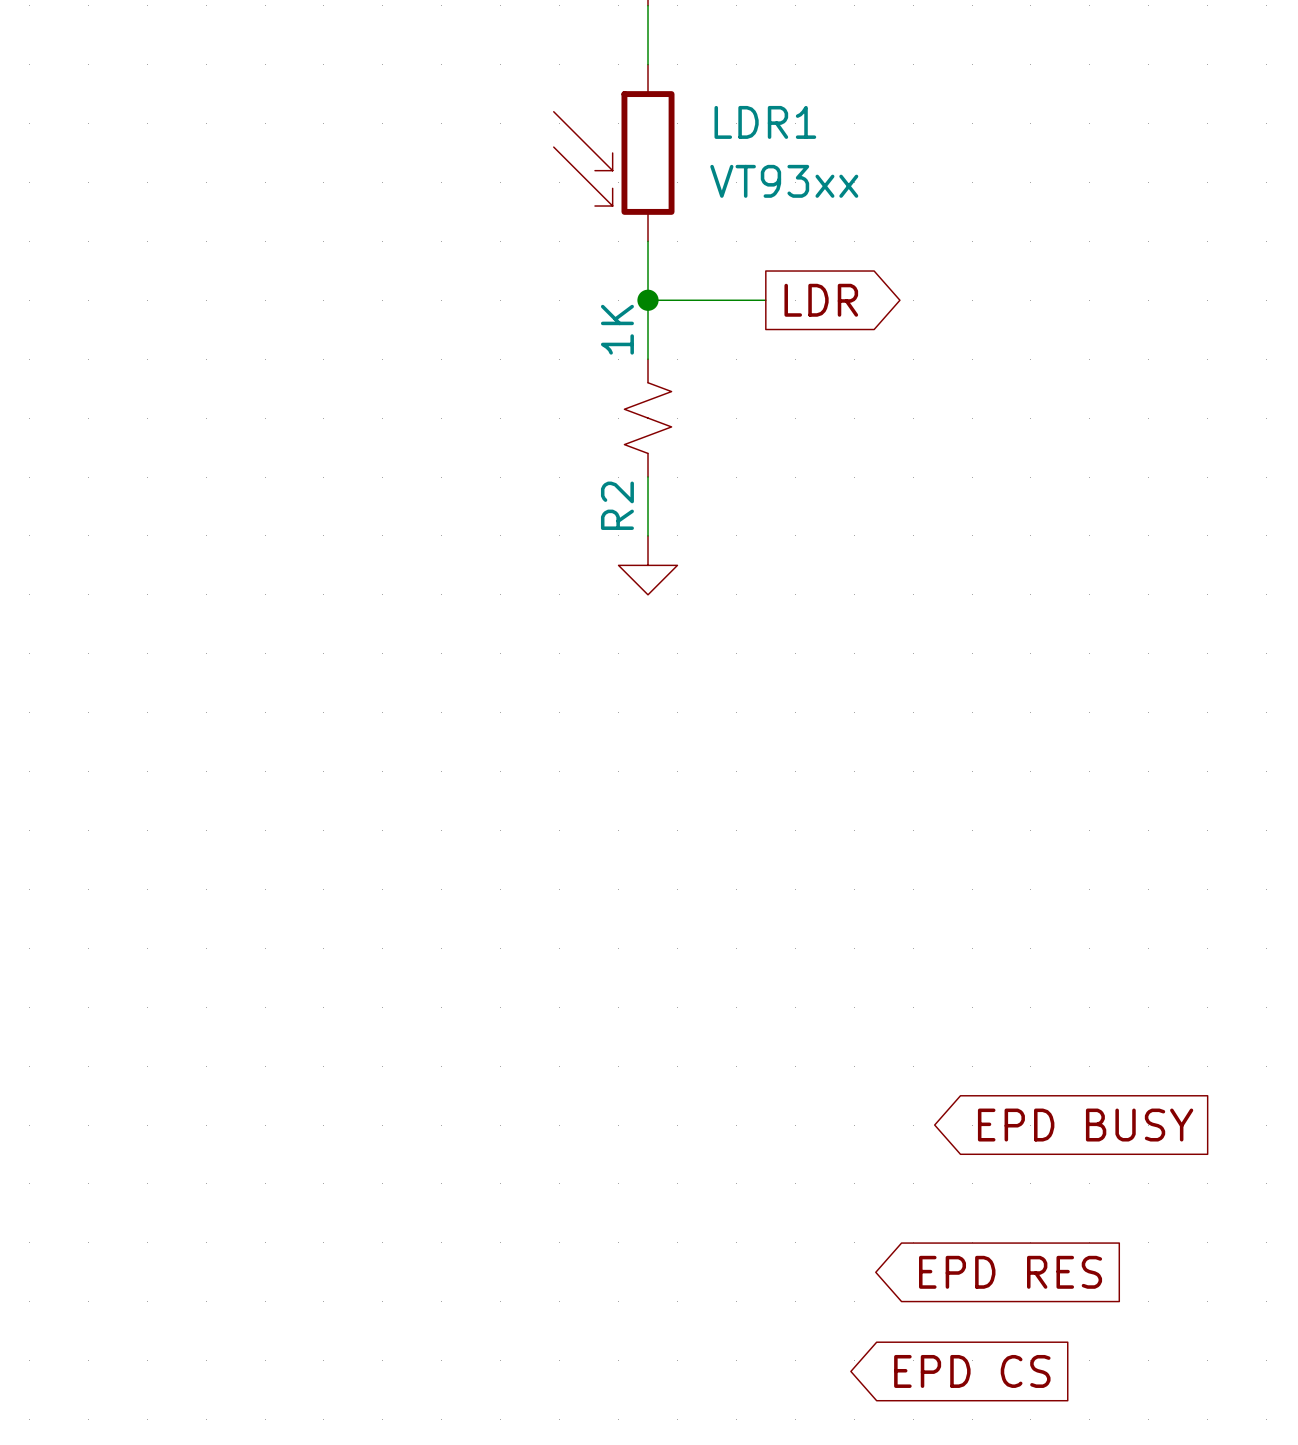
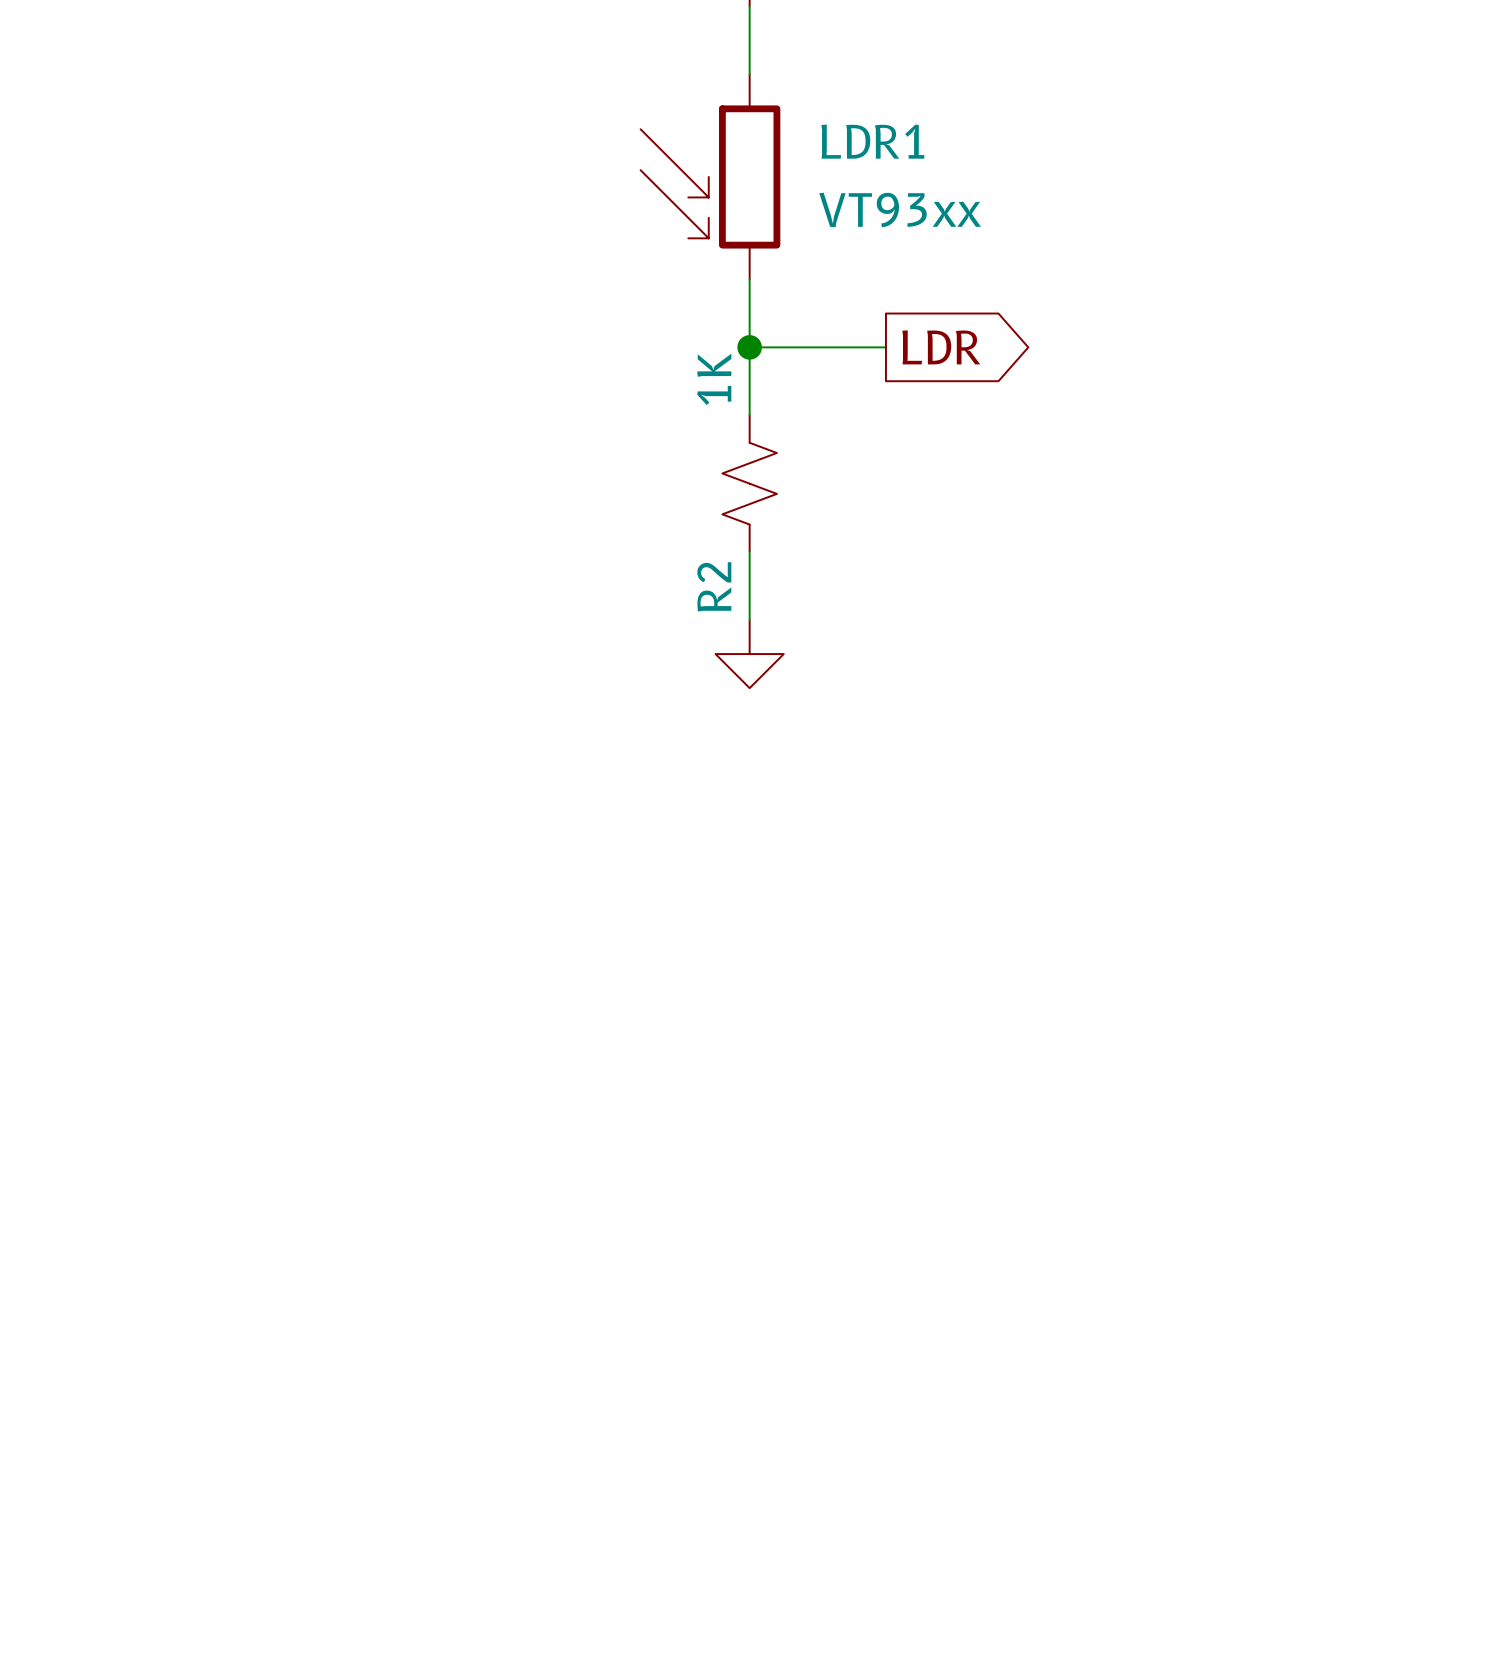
global label: EPD BUSY (1085, 1125) -> none
global label: EPD RES (1010, 1272) -> none
global label: EPD CS (972, 1371) -> none

